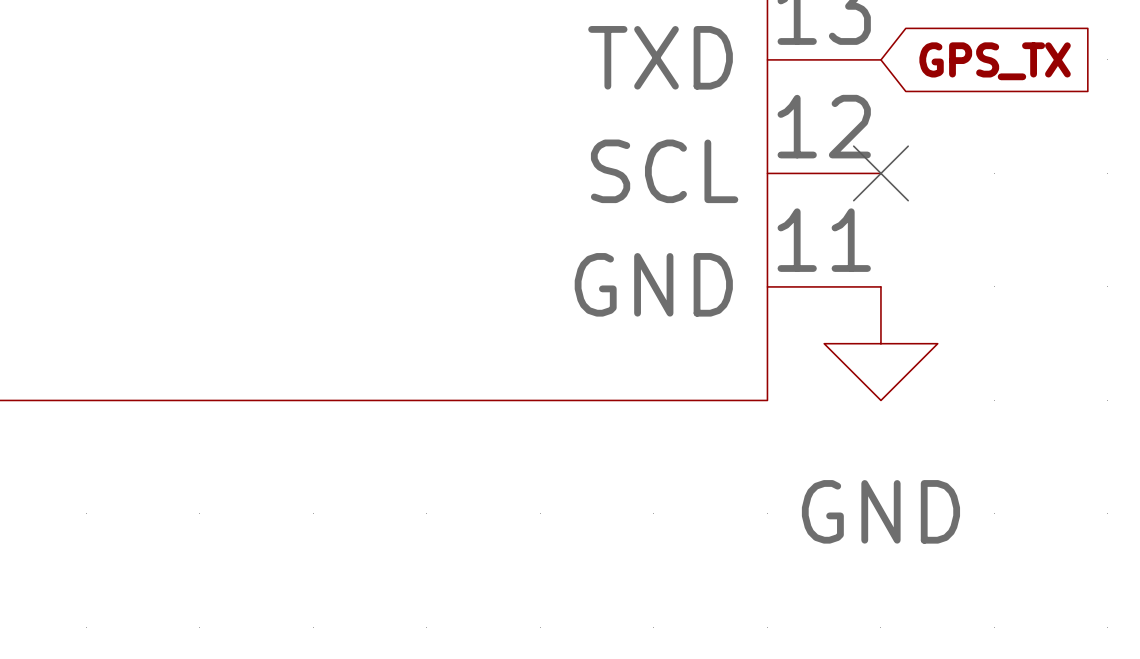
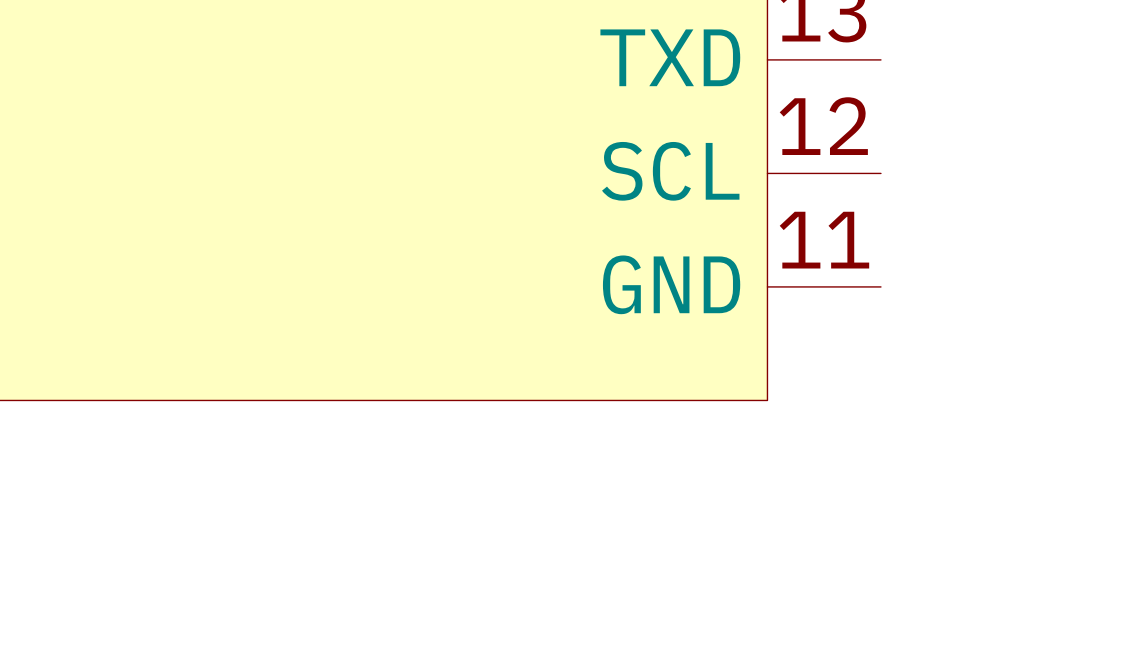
global label: GPS_TX (995, 61) -> none
no-connect mark: (880, 173) -> none
power symbol: GND (880, 343) -> none

